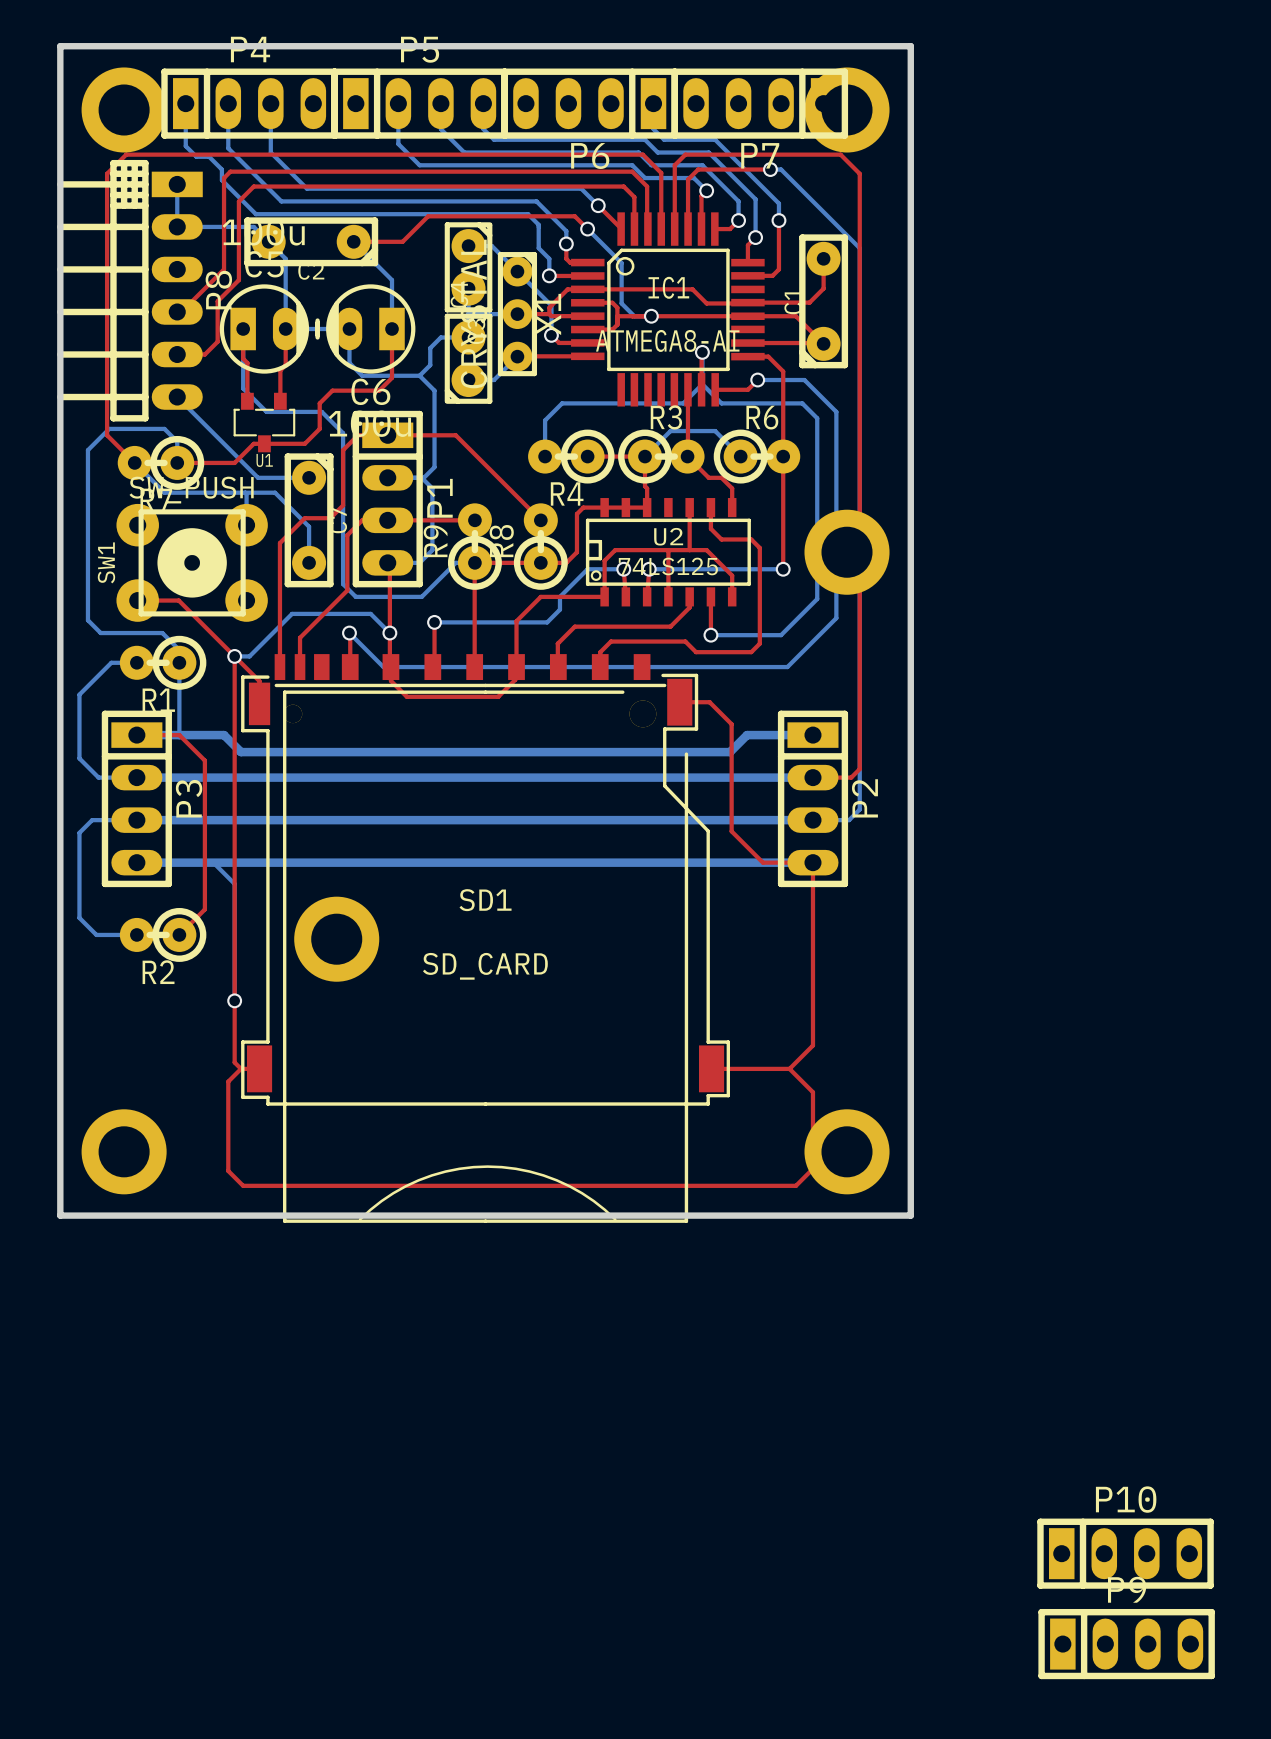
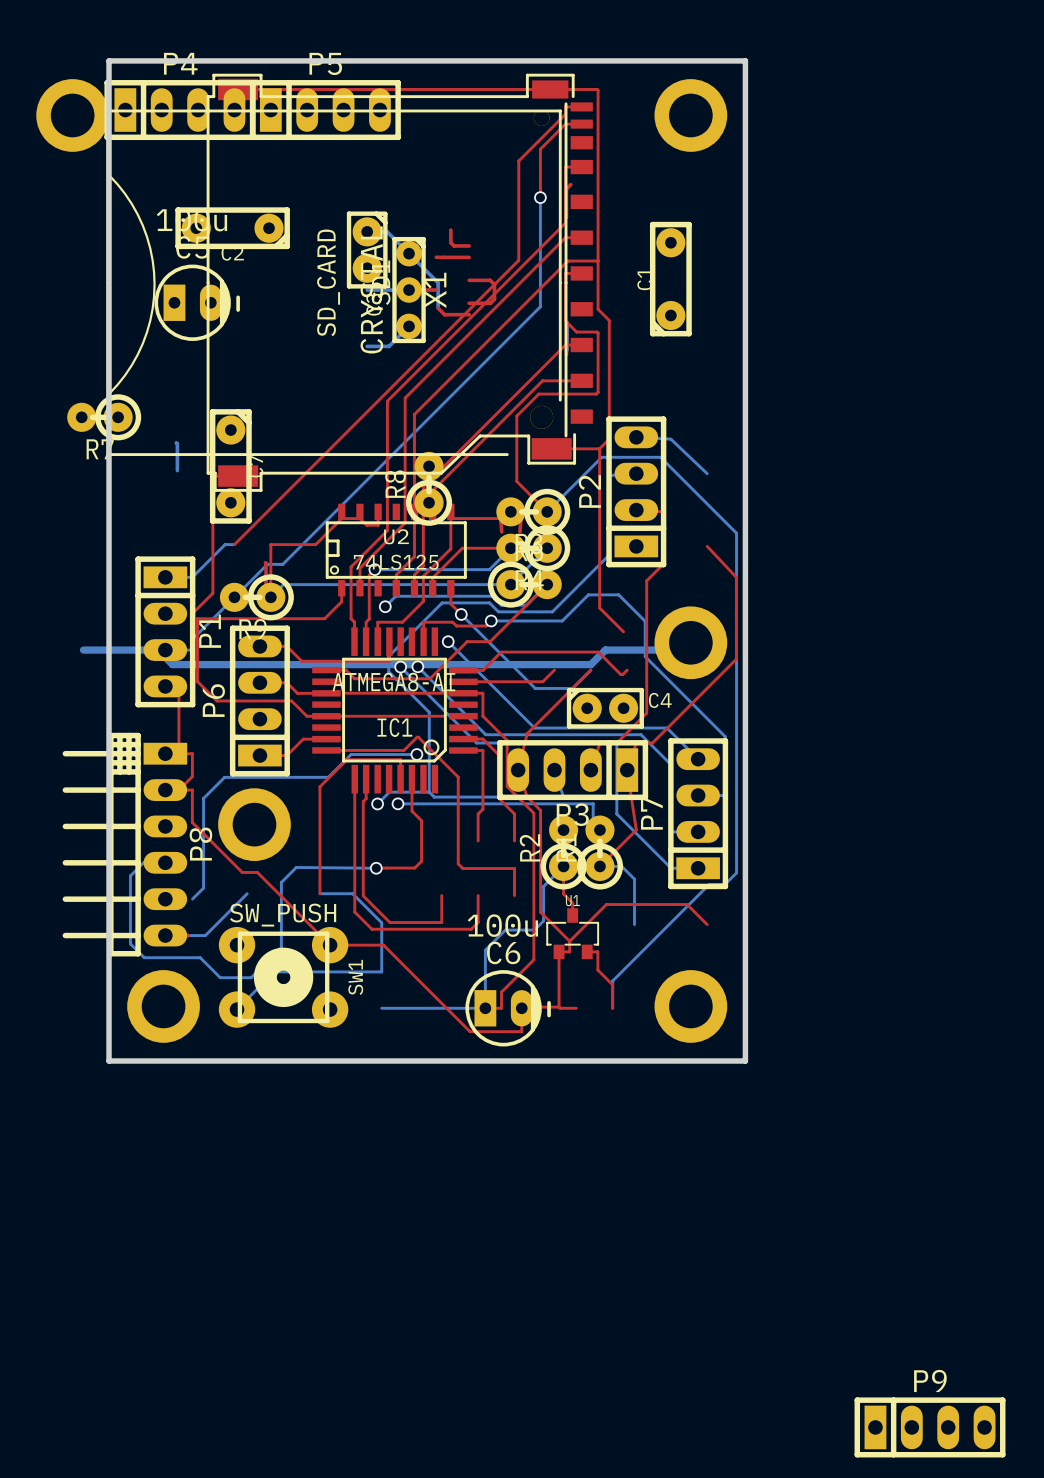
board edge: (166, 46) (60, 46) (60, 1215) (166, 1215) -> (109, 60) (109, 1061)
top track: none -> (238, 89) (597, 89) (598, 309) (609, 320) (609, 439) (599, 448)
top track: none -> (581, 106) (565, 106) (565, 114) (518, 161) (518, 260) (234, 544)
bottom track: (185, 103) (185, 146) (196, 156) (209, 156) (221, 169) (221, 180) (255, 214) (528, 214) (538, 224) (538, 248) (549, 258) (549, 275) -> none
bottom track: (228, 103) (228, 148) (281, 201) (536, 201) (566, 231) (566, 243) -> none
bottom track: (270, 103) (270, 152) (306, 188) (581, 188) (598, 205) -> none
bottom track: (398, 103) (398, 144) (419, 165) (632, 165) (645, 178) (693, 178) (706, 190) -> none
bottom track: (440, 103) (440, 129) (464, 152) (638, 152) (651, 165) (702, 165) (738, 201) (738, 220) -> none
bottom track: (483, 103) (483, 129) (494, 139) (645, 139) (657, 152) (708, 152) (755, 199) (755, 237) -> none
P6 rotation: 0° (589, 103) -> 90° clockwise (259, 700)
P6 position: (589, 103) -> (259, 700)
bottom track: (653, 103) (653, 129) (664, 139) (715, 139) (778, 203) (778, 220) -> none
P7 rotation: 0° (759, 103) -> 90° clockwise (698, 813)
P7 position: (759, 103) -> (698, 813)
top track: none -> (581, 124) (565, 124) (540, 149) (540, 197)
top track: (770, 169) (698, 169) (688, 179) (688, 229) -> none
bottom track: (770, 169) (781, 169) (859, 248) (859, 809) (849, 820) (92, 820) (79, 832) (79, 917) (96, 934) (136, 934) -> none
via: (770, 169) -> none
top track: none -> (581, 167) (565, 167) (565, 223) (387, 401) (387, 530) (351, 566) (351, 618) (354, 622) (354, 641)
bottom track: (177, 184) (177, 226) (253, 226) (285, 258) (285, 328) (349, 328) (349, 363) (362, 375) (419, 375) -> none
via: (706, 190) -> none
top track: (598, 205) (621, 229) -> none
via: (598, 205) -> none
bottom track: none -> (540, 197) (540, 306) (282, 564) (267, 564) (192, 639) (192, 650) (165, 650)
via: none -> (540, 197)
top track: (738, 220) (730, 229) (714, 229) -> none
via: (738, 220) -> none
top track: (778, 220) (778, 269) (772, 275) (747, 275) -> none
via: (778, 220) -> none
top track: (587, 229) (574, 216) (428, 216) (402, 241) (353, 241) -> none
bottom track: (587, 229) (621, 263) (621, 303) (634, 316) (651, 316) -> none
via: (587, 229) -> none
top track: (634, 229) (634, 197) (623, 186) (253, 186) (238, 201) (238, 280) (217, 301) (217, 341) (204, 354) (177, 354) -> none
top track: (647, 229) (647, 186) (632, 171) (230, 171) (224, 178) (224, 269) (181, 311) (177, 311) -> none
top track: (661, 229) (661, 173) (642, 154) (126, 154) (107, 173) (107, 435) (134, 462) -> none
top track: (674, 229) (674, 165) (685, 154) (840, 154) (859, 173) (859, 769) (851, 777) (812, 777) -> none
top track: (755, 237) (747, 245) (747, 262) -> none
via: (755, 237) -> none
bottom track: (353, 241) (392, 280) (392, 328) -> none
via: (566, 243) -> none
top track: none -> (581, 237) (565, 237) (405, 398) (405, 522) (359, 568) (359, 588)
top track: (823, 258) (823, 288) (809, 302) (706, 303) (692, 289) (567, 289) (549, 307) (549, 314) (551, 316) (587, 316) -> none
via: (549, 275) -> none
top track: none -> (598, 261) (567, 261) (414, 414) (414, 556) (396, 574) (396, 588)
bottom track: (468, 288) (468, 337) (440, 337) (430, 348) (430, 365) (419, 375) -> none
P8 position: (129, 290) -> (124, 844)
top track: none -> (581, 273) (565, 273) (565, 320) (576, 332) (598, 332) (598, 392) (596, 394) (538, 394) (516, 416) (516, 481) (547, 511) (547, 548)
IC1 rotation: 0° (667, 309) -> 180° (394, 710)
IC1 position: (667, 309) -> (394, 710)
top track: (617, 316) (795, 316) (823, 343) -> none
via: (651, 316) -> none
top track: (243, 328) (243, 358) (247, 363) (247, 401) -> none
bottom track: (243, 328) (243, 388) (266, 411) (321, 411) (343, 433) (343, 584) (355, 596) (421, 596) (455, 562) (474, 562) -> none
top track: (285, 328) (285, 365) (280, 370) (280, 401) -> none
C6 rotation: 0° (365, 328) -> 180° (508, 1008)
C6 position: (365, 328) -> (508, 1008)
top track: (392, 328) (392, 377) (379, 390) (332, 390) (319, 403) (319, 428) (304, 443) (253, 443) (234, 462) (177, 462) -> none
via: (551, 335) -> none
top track: (747, 343) (822, 343) -> none
via: (702, 352) -> none
top track: (587, 356) (517, 356) -> none
top track: (747, 356) (768, 356) (783, 371) (783, 569) -> none
C4 rotation: 0° (468, 358) -> 90° clockwise (605, 708)
C4 position: (468, 358) -> (605, 708)
bottom track: (419, 375) (434, 390) (434, 467) (423, 477) (387, 477) -> none
top track: none -> (581, 345) (565, 345) (423, 487) (423, 566) (414, 574) (414, 588)
top track: (757, 380) (747, 389) (715, 389) -> none
bottom track: (757, 380) (804, 380) (836, 411) (836, 618) (787, 667) (383, 667) (349, 633) -> none
via: (757, 380) -> none
top track: (687, 389) (687, 456) (708, 477) (721, 477) (732, 488) (732, 507) -> none
bottom track: (177, 397) (258, 477) (309, 477) -> none
top track: none -> (581, 380) (542, 380) (432, 490) (432, 511)
U1 rotation: 0° (264, 422) -> 180° (572, 933)
U1 position: (264, 422) -> (572, 933)
bottom track: (545, 456) (545, 420) (562, 403) (683, 403) (702, 384) (721, 403) (802, 403) (817, 418) (817, 599) (781, 635) (710, 635) -> none
R4 position: (571, 456) -> (533, 548)
top track: (587, 456) (645, 456) (647, 507) (583, 507) (576, 513) (576, 552) (566, 562) (474, 562) (474, 667) -> none
bottom track: (645, 456) (670, 431) (715, 431) (740, 456) -> none
R3 rotation: 0° (661, 456) -> 180° (533, 511)
R3 position: (661, 456) -> (533, 511)
R6 position: (756, 456) -> (524, 584)
bottom track: (134, 462) (164, 492) (275, 492) (309, 526) (309, 562) -> none
bottom track: (177, 462) (177, 441) (164, 428) (109, 428) (87, 450) (87, 620) (100, 633) (162, 633) (179, 650) (179, 735) -> none
bottom track: (421, 477) (432, 488) (432, 550) (419, 562) (387, 562) -> none
bottom track: none -> (636, 437) (670, 439) (707, 473)
P1 position: (387, 499) -> (165, 631)
top track: none -> (551, 448) (599, 448)
top track: none -> (599, 448) (599, 607) (623, 631)
top track: (689, 507) (689, 550) -> none
top track: (710, 507) (710, 528) (721, 539) (751, 539) (759, 547) (759, 643) (751, 652) (696, 652) (685, 641) (611, 641) (600, 652) (600, 667) -> none
top track: (474, 520) (362, 520) (347, 535) (347, 590) (300, 637) (300, 667) -> none
top track: (540, 520) (455, 435) (357, 435) (343, 450) (343, 505) (330, 518) (304, 518) (279, 543) (279, 667) -> none
bottom track: none -> (636, 473) (609, 475) (609, 554) (552, 611) (498, 611) (489, 602) (442, 602) (388, 656) (388, 671) (429, 712) (429, 792)
top track: none -> (238, 476) (212, 476) (212, 593) (192, 613)
R9 rotation: 0° (474, 546) -> 90° counterclockwise (256, 597)
R9 position: (474, 546) -> (256, 597)
top track: (668, 550) (668, 596) -> none
U2 position: (668, 552) -> (396, 550)
part position: (847, 552) -> (690, 642)
SW1 name position: SW1 (106, 562) -> SW1 (355, 977)
SW1 position: (192, 562) -> (283, 977)
top track: (387, 562) (389, 565) (389, 664) (392, 667) -> none
bottom track: (623, 569) (587, 569) (559, 596) (559, 609) (547, 622) (434, 622) -> none
via: (623, 569) -> none
bottom track: (649, 569) (783, 569) -> none
via: (649, 569) -> none
via: (783, 569) -> none
top track: none -> (636, 510) (663, 511) (663, 564) (646, 580) (646, 713) (616, 743) (599, 743) (590, 770)
top track: none -> (378, 511) (378, 525) (366, 525) (359, 518)
top track: none -> (450, 511) (450, 548) (423, 576) (423, 601) (402, 622) (377, 622) (377, 641)
top track: none -> (510, 511) (504, 518) (450, 518)
bottom track: none -> (547, 511) (601, 457) (660, 457) (736, 533) (736, 872) (725, 884) (709, 884) (612, 981) (612, 1008)
top track: none -> (341, 518) (359, 518)
top track: none -> (341, 518) (315, 544) (270, 544) (270, 597)
top track: (689, 596) (689, 607) (670, 626) (574, 626) (557, 643) (558, 667) -> none
top track: (710, 596) (710, 635) -> none
top track: (732, 596) (732, 575) (706, 550) (615, 550) (604, 560) (604, 596) (540, 596) (516, 621) (516, 667) -> none
top track: (137, 600) (178, 600) (259, 681) (259, 703) -> none
bottom track: none -> (234, 544) (225, 544) (192, 577) (165, 577)
top track: none -> (707, 546) (736, 577) (736, 658) (652, 743) (636, 743) (627, 770) (636, 830) (599, 866)
top track: none -> (510, 548) (462, 548) (432, 577) (432, 588)
bottom track: none -> (510, 548) (489, 569) (374, 569)
bottom track: none -> (547, 548) (510, 584) (283, 584) (270, 597)
top track: (434, 622) (434, 664) (432, 667) -> none
via: (434, 622) -> none
via: (349, 633) -> none
bottom track: (389, 633) (370, 613) (292, 613) (249, 656) (234, 656) -> none
via: (389, 633) -> none
via: (710, 635) -> none
top track: none -> (374, 569) (369, 575) (369, 619) (366, 622) (366, 641)
via: none -> (374, 569)
top track: (234, 656) (234, 1062) (241, 1068) (228, 1081) (228, 1170) (243, 1185) (795, 1185) (812, 1168) (812, 1092) (789, 1068) -> none
via: (234, 656) -> none
top track: none -> (547, 584) (490, 641) (467, 641) (430, 678) (354, 678) (345, 670) (326, 670)
bottom track: none -> (547, 584) (526, 605) (501, 605) (492, 596) (395, 596) (385, 606)
bottom track: (136, 662) (111, 662) (79, 694) (79, 758) (98, 777) (812, 777) -> none
R1 rotation: 0° (163, 662) -> 90° clockwise (599, 852)
R1 position: (163, 662) -> (599, 852)
top track: none -> (341, 588) (341, 601) (324, 618) (197, 618) (197, 681) (216, 700) (291, 700) (306, 716) (443, 716)
top track: none -> (450, 588) (450, 604) (461, 614)
top track: (392, 667) (390, 680) (406, 696) (498, 696) (515, 679) (516, 667) -> none
via: none -> (385, 606)
bottom track: none -> (461, 614) (535, 688) (572, 688) (590, 670)
via: none -> (461, 614)
top track: none -> (491, 620) (486, 626) (456, 626) (452, 622) (423, 622) (423, 641)
bottom track: none -> (491, 620) (562, 620) (588, 594) (618, 594) (645, 621) (645, 656) (725, 736) (725, 795) (698, 795)
via: none -> (491, 620)
top track: (680, 702) (709, 702) (731, 724) (731, 831) (762, 862) (812, 862) (812, 1045) (789, 1068) -> none
top track: none -> (389, 641) (389, 661) (301, 661) (286, 646) (259, 646)
bottom track: none -> (448, 641) (534, 728) (667, 728) (698, 759)
via: none -> (448, 641)
top track: (136, 735) (179, 735) (204, 760) (204, 909) (179, 934) -> none
bottom track: none -> (400, 667) (476, 743) (615, 743) (616, 813) (671, 868) (698, 868)
via: none -> (400, 667)
bottom track: none -> (417, 666) (485, 734) (641, 734) (671, 764) (671, 831) (698, 831)
via: none -> (417, 666)
top track: none -> (554, 670) (542, 681) (463, 681)
top track: none -> (590, 670) (527, 733) (518, 770) (527, 797) (540, 810) (540, 912) (569, 941)
top track: none -> (627, 670) (620, 674) (598, 652) (501, 652) (482, 670) (463, 670)
top track: none -> (259, 682) (286, 682) (297, 693) (326, 693)
top track: none -> (178, 686) (178, 753)
top track: none -> (345, 693) (482, 693) (482, 716) (507, 740) (507, 786) (533, 813) (533, 959) (501, 992) (501, 1008) (485, 1008)
P3 rotation: 0° (136, 798) -> 90° clockwise (572, 770)
P3 position: (136, 798) -> (572, 770)
P2 rotation: 0° (812, 798) -> 180° (636, 491)
P2 position: (812, 798) -> (636, 491)
top track: none -> (326, 739) (303, 739) (286, 755) (259, 755)
top track: none -> (463, 739) (482, 739) (498, 754) (498, 797) (514, 813) (514, 840)
top track: none -> (326, 750) (403, 750) (418, 737) (458, 777) (458, 863) (462, 868) (514, 868) (514, 895)
top track: none -> (463, 750) (482, 750) (482, 809) (478, 813) (478, 840)
top track: none -> (165, 753) (192, 753) (192, 776) (178, 790)
via: none -> (416, 754)
bottom track: none -> (417, 754) (351, 754) (328, 777) (224, 777) (203, 798) (203, 888) (192, 899)
bottom track: (812, 862) (136, 862) (213, 862) (234, 883) (234, 1000) -> none
bottom track: none -> (554, 770) (563, 797) (434, 797) (429, 792)
top track: none -> (354, 779) (354, 912) (371, 929) (471, 929) (478, 922) (478, 895)
top track: none -> (366, 779) (366, 798) (363, 801) (363, 895) (389, 922) (441, 922) (441, 895)
top track: none -> (400, 779) (400, 759) (347, 759) (319, 786) (319, 893)
top track: none -> (412, 779) (412, 811) (421, 820) (421, 861) (414, 868) (376, 868)
top track: none -> (165, 790) (192, 790) (192, 822) (242, 872) (257, 872) (330, 945) (383, 945) (470, 1031) (521, 1031) (521, 1008) (559, 1007)
bottom track: none -> (429, 792) (389, 792) (377, 803)
bottom track: none -> (398, 803) (593, 803) (593, 823) (599, 830)
via: none -> (398, 803)
via: none -> (377, 803)
R2 rotation: 0° (163, 934) -> 90° clockwise (563, 852)
R2 position: (163, 934) -> (563, 852)
SD1 rotation: 0° (485, 938) -> 90° clockwise (349, 282)
SD1 position: (485, 938) -> (349, 282)
bottom track: none -> (165, 862) (143, 862) (130, 875) (130, 943) (144, 957) (200, 957) (220, 977) (251, 977) (281, 947) (281, 882) (296, 867) (376, 868)
top track: none -> (563, 866) (563, 893) (572, 903) (572, 915)
via: none -> (376, 868)
via: (234, 1000) -> none
bottom track: none -> (247, 893) (205, 935) (165, 935)
bottom track: none -> (319, 893) (352, 893) (381, 922) (381, 971) (274, 971) (237, 1009)
bottom track: none -> (634, 924) (634, 879) (621, 866) (563, 866) (543, 886) (543, 921) (534, 930) (505, 930) (485, 950) (485, 1008) (381, 1008)
top track: none -> (707, 924) (687, 904) (606, 904) (569, 941)
top track: (711, 1068) (789, 1068) -> none
top track: none -> (569, 941) (569, 951) (559, 951) (559, 1007)
top track: none -> (587, 951) (597, 951) (597, 970) (612, 984) (612, 1008)
part position: (124, 1151) -> (163, 1006)
top track: none -> (559, 1007) (576, 1008)
P10: (1125, 1553) -> none

